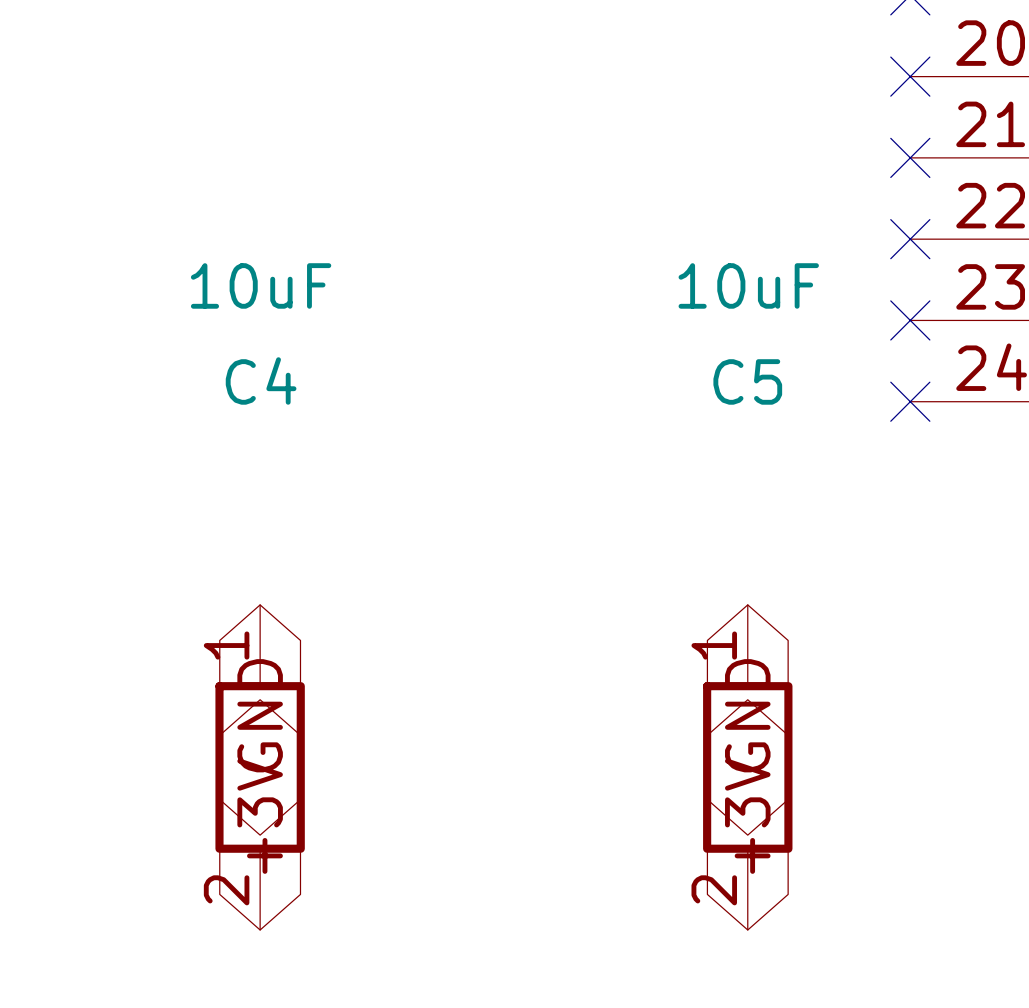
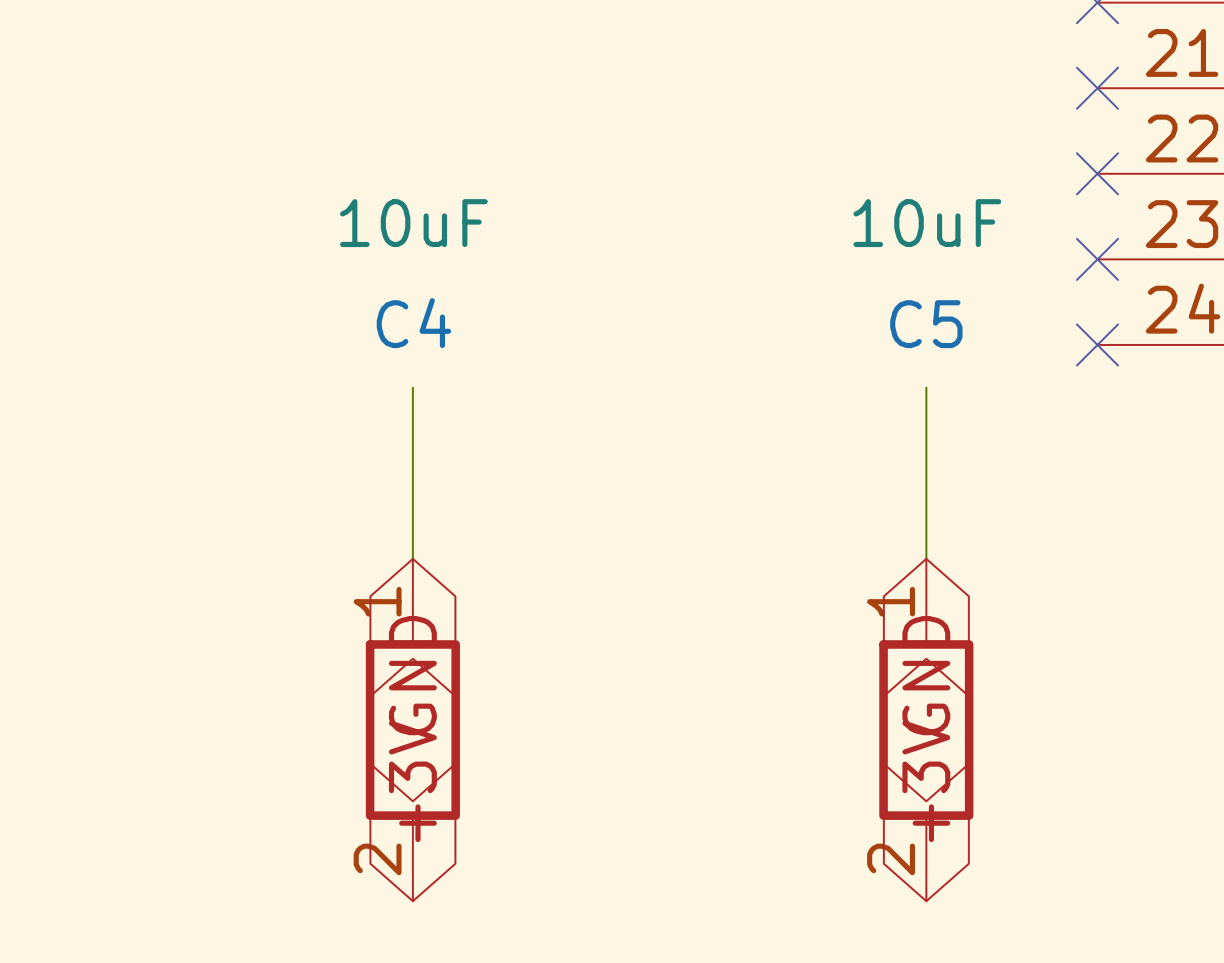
wire: none -> (412, 387) (412, 558)
wire: none -> (926, 387) (926, 558)

